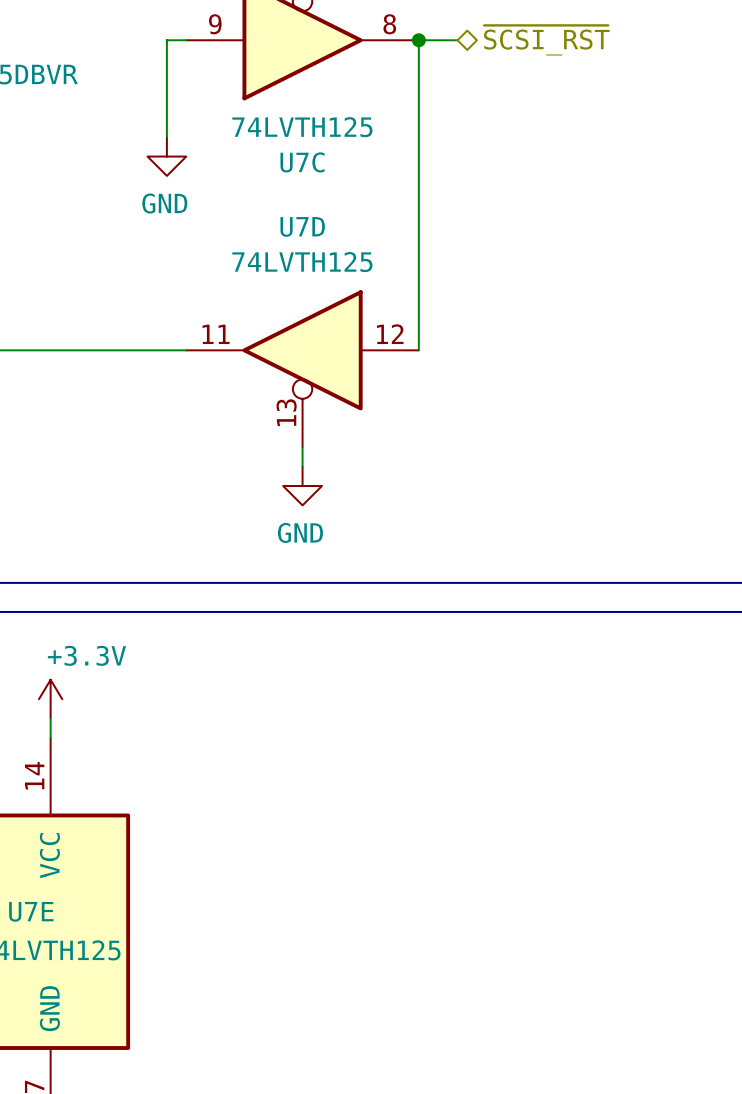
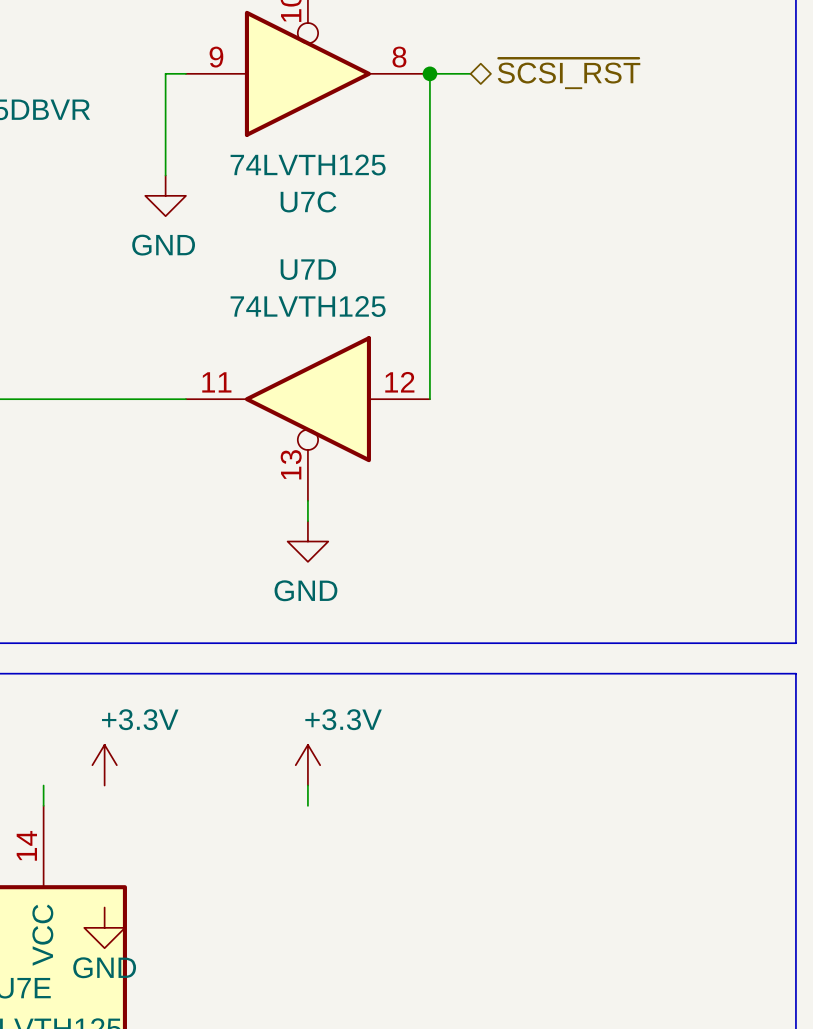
power symbol position: +3.3V (50, 699) -> +3.3V (104, 765)
power symbol: none -> +3.3V (307, 765)
wire: none -> (307, 785) (307, 805)
power symbol: none -> GND (104, 927)

